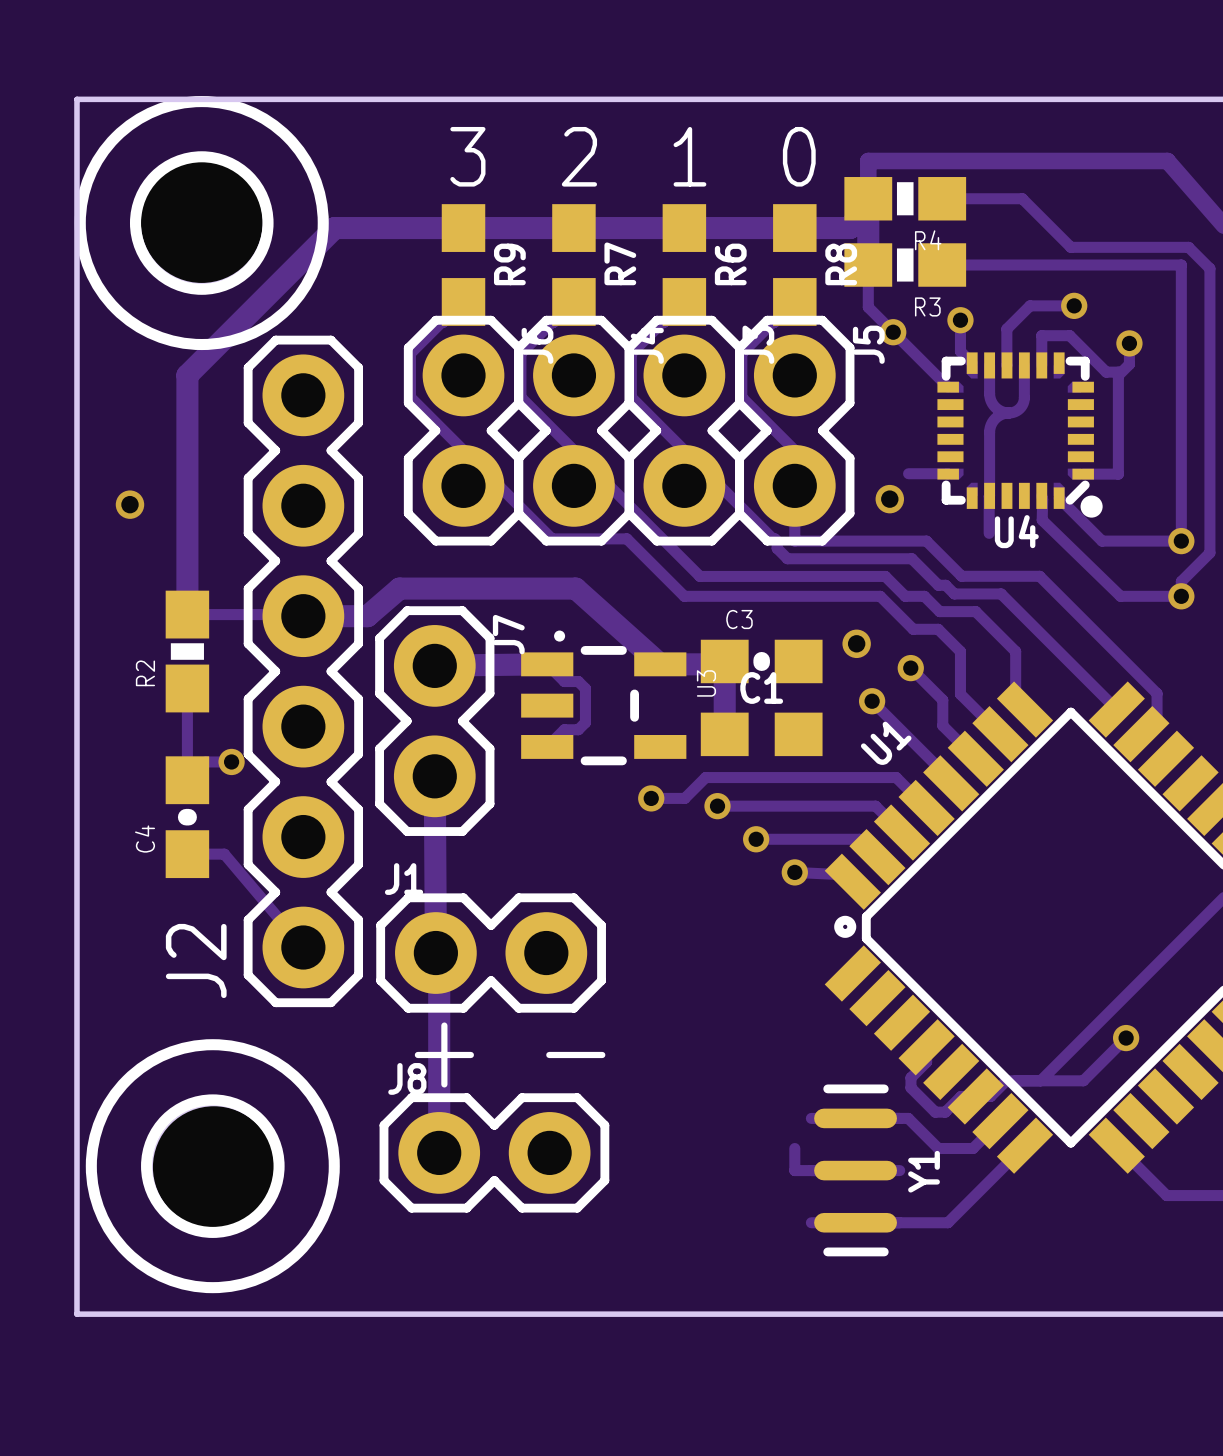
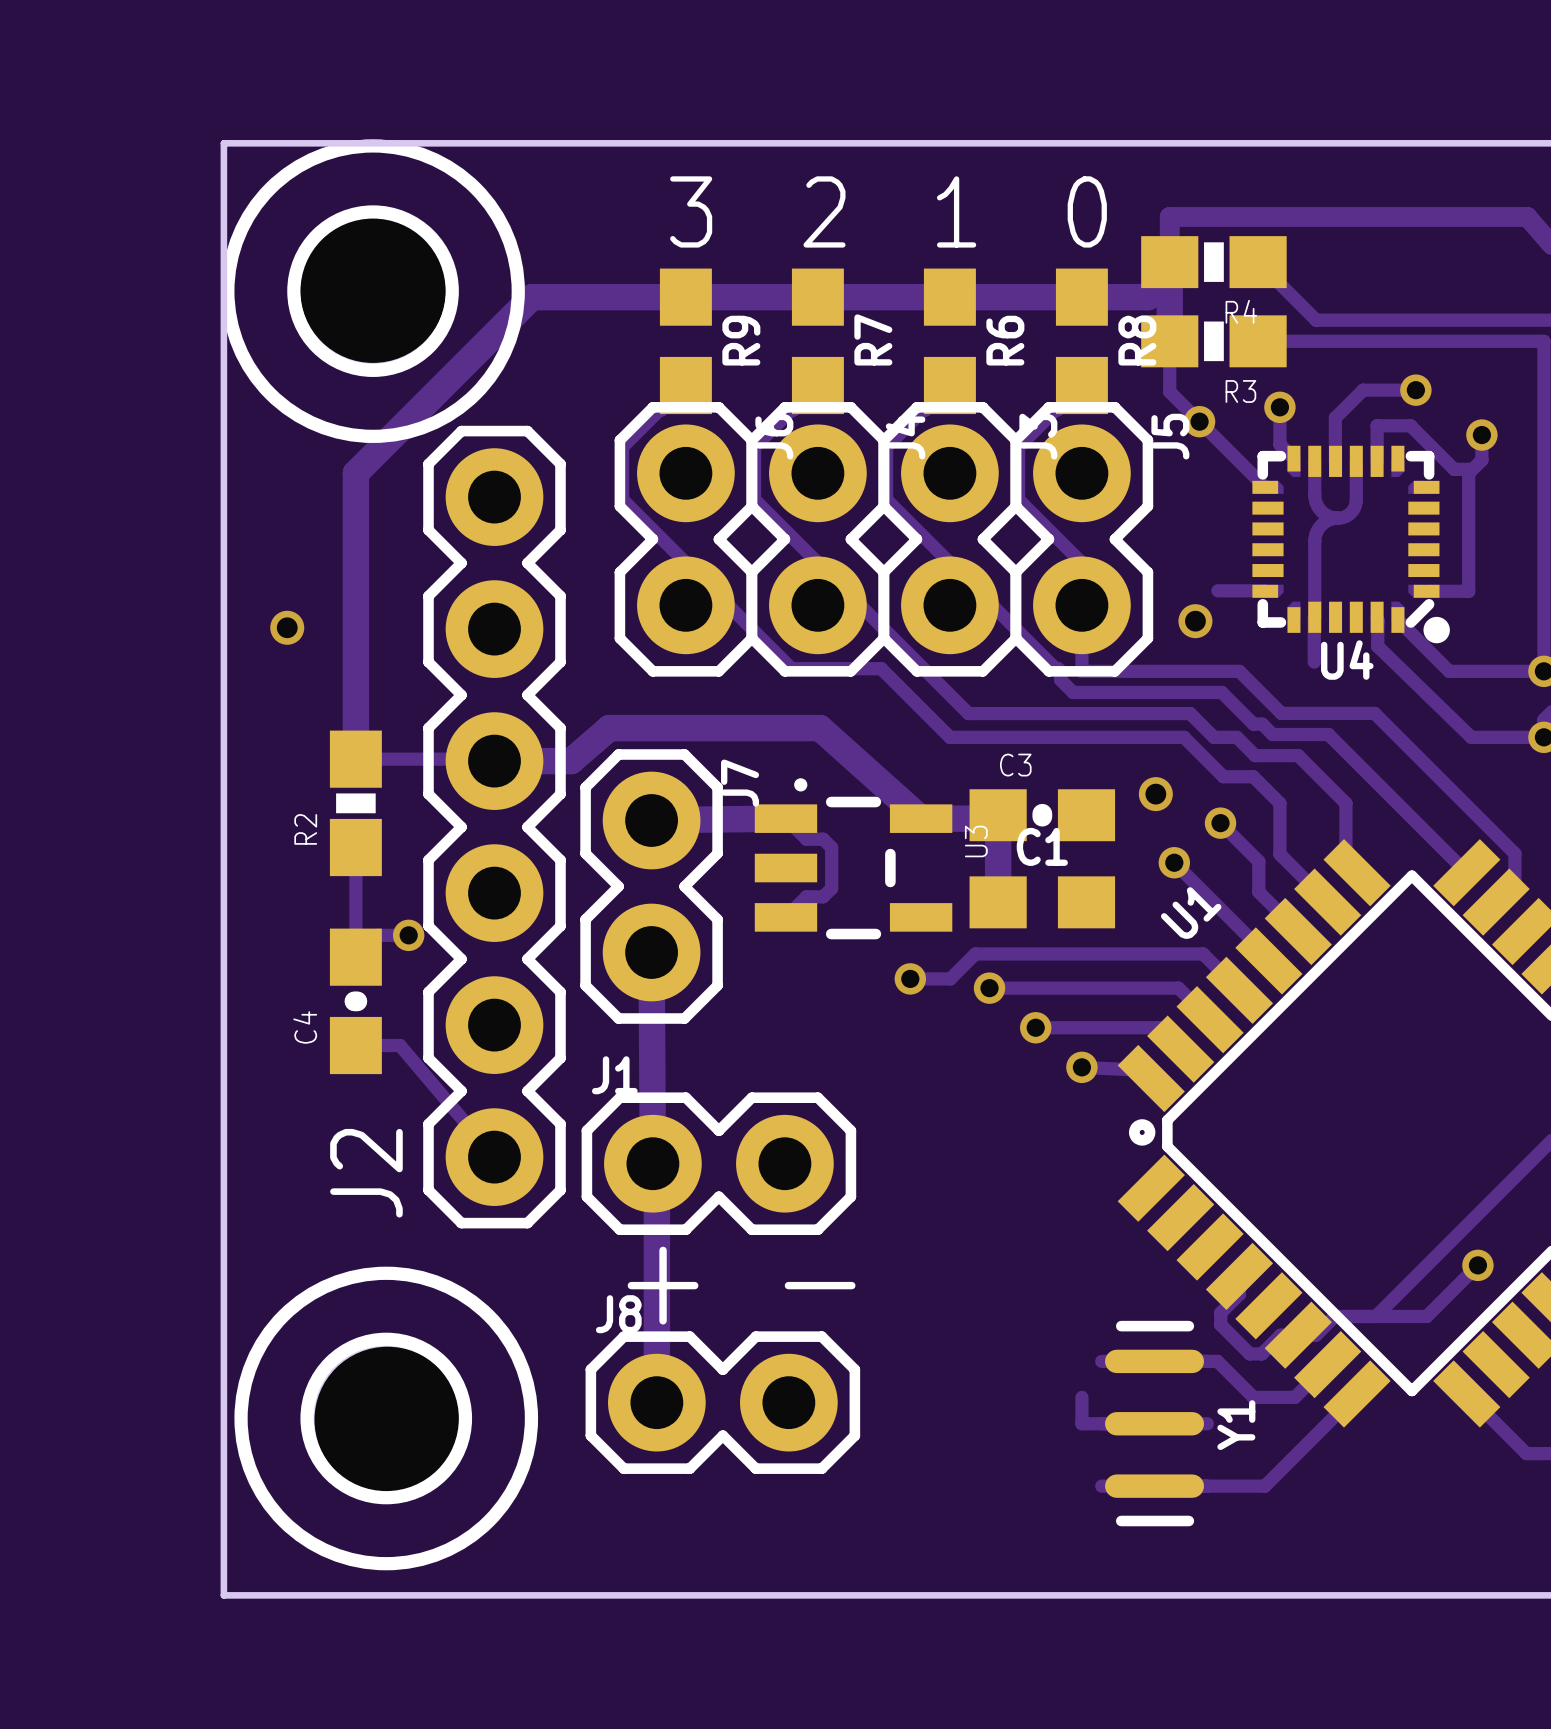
track: (942, 198) (1022, 198) (1070, 247) -> (1258, 262) (1316, 320) (1411, 320)

